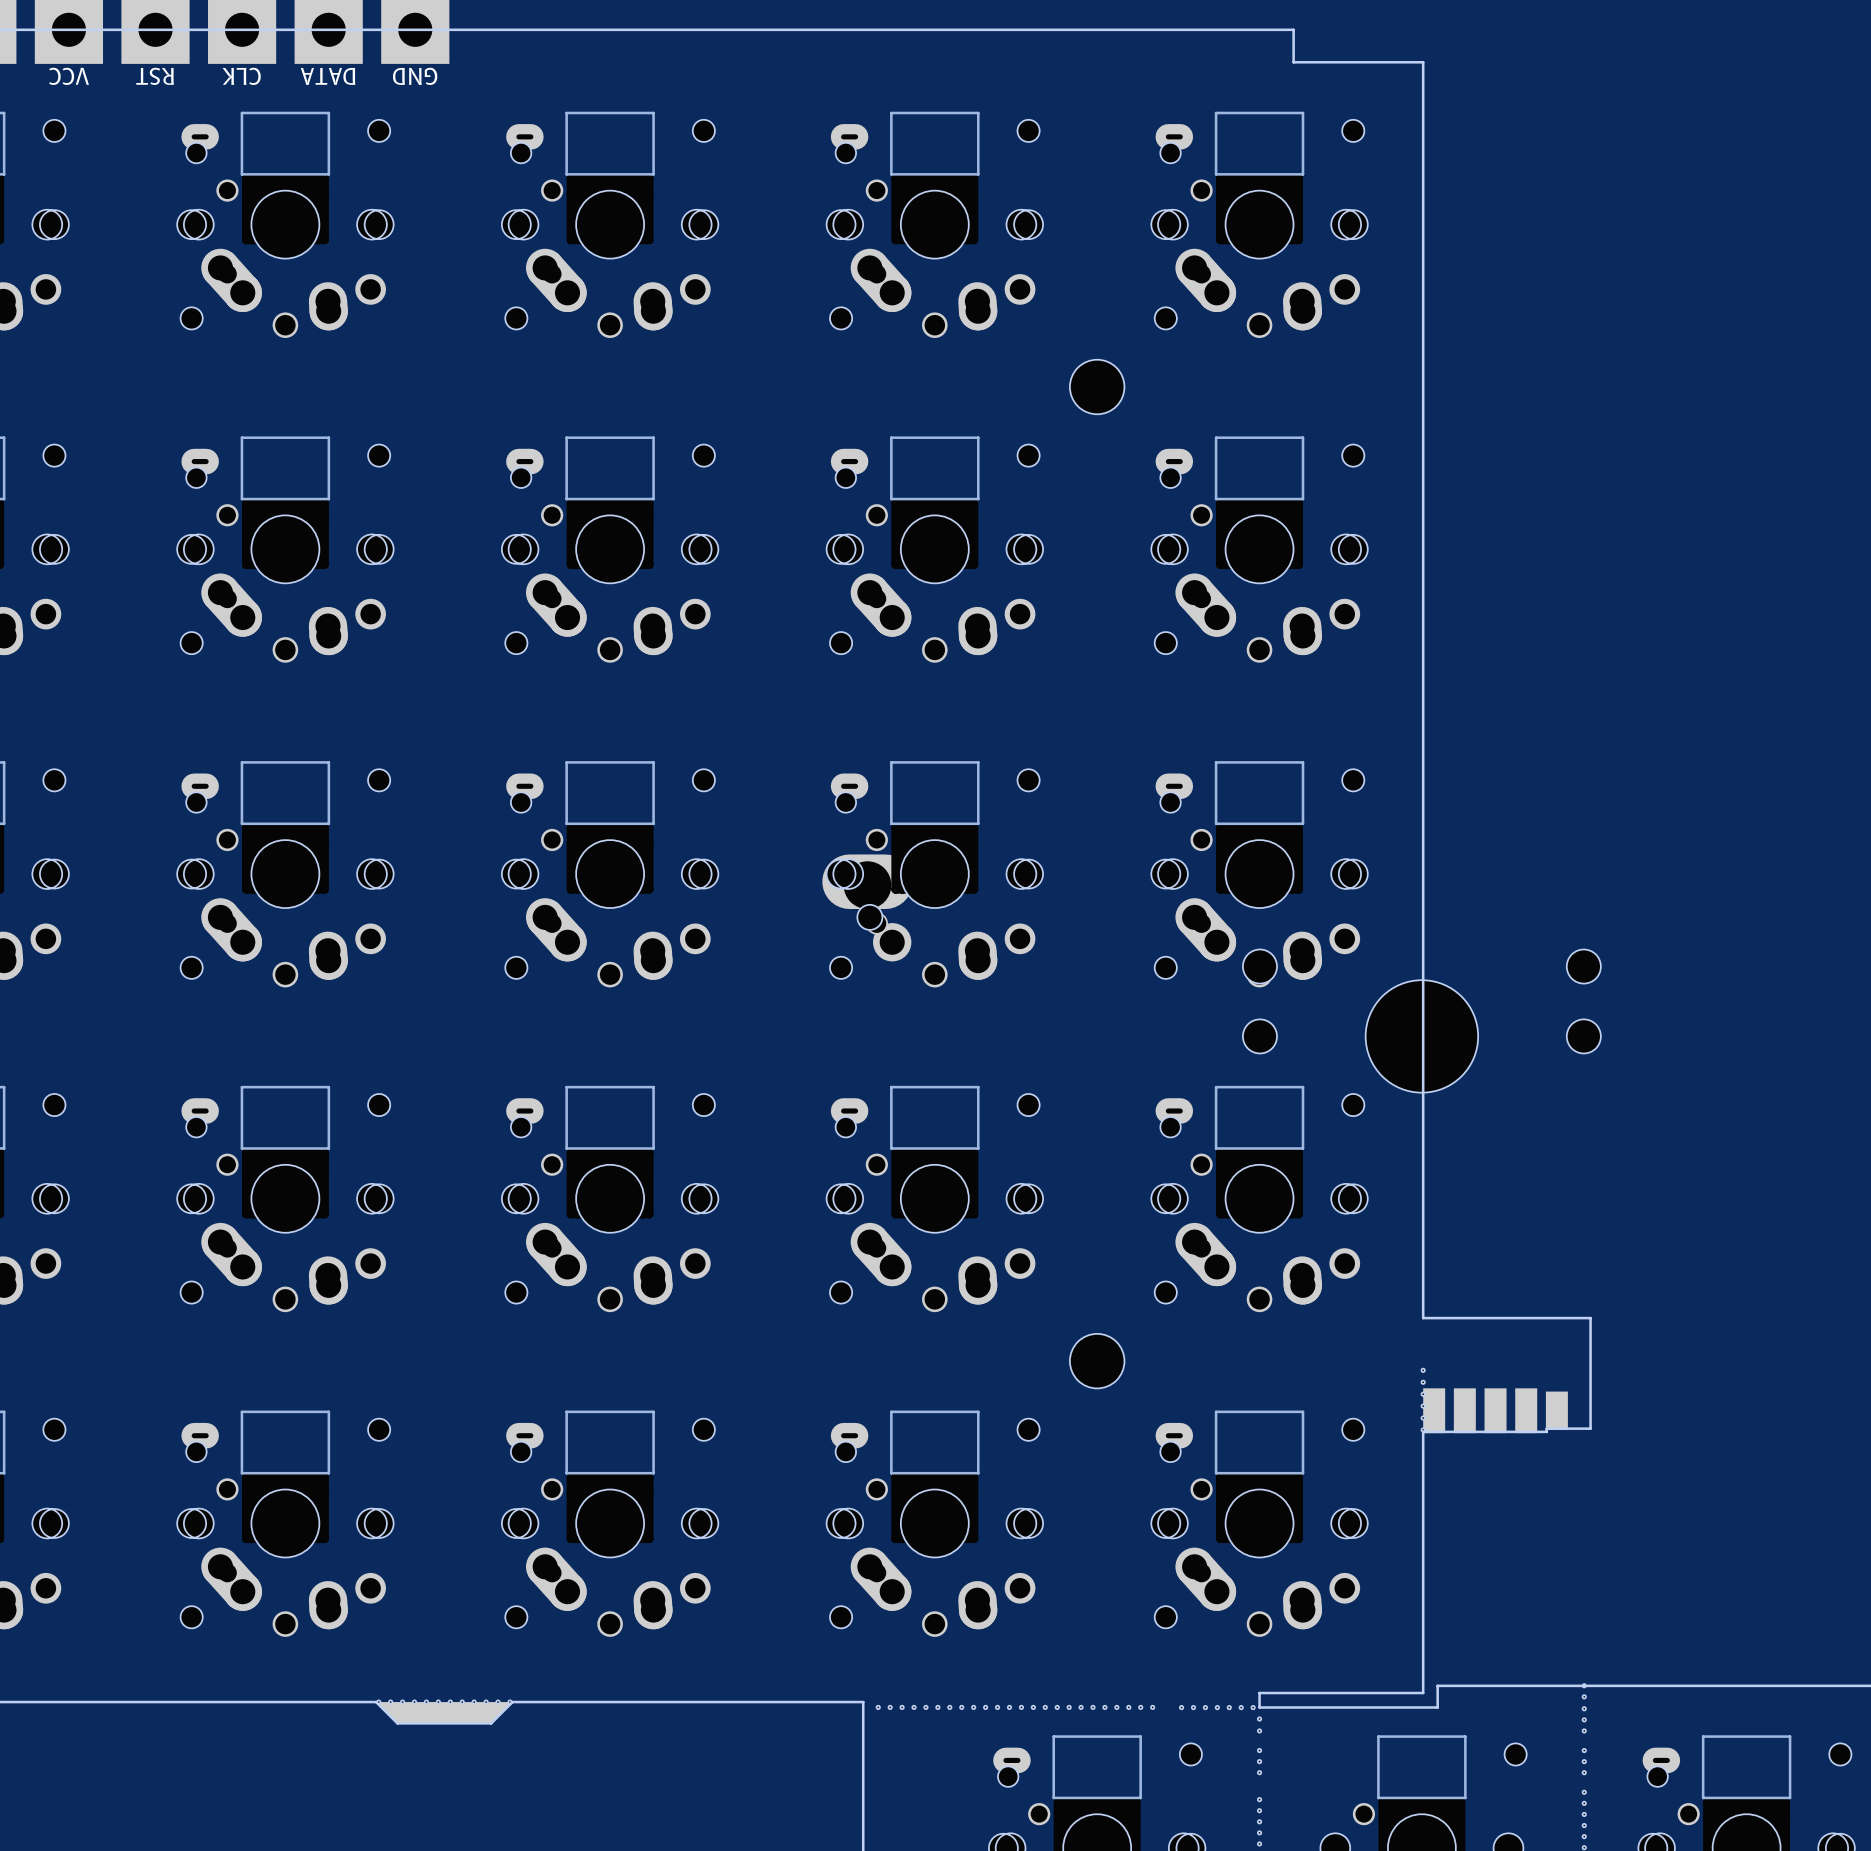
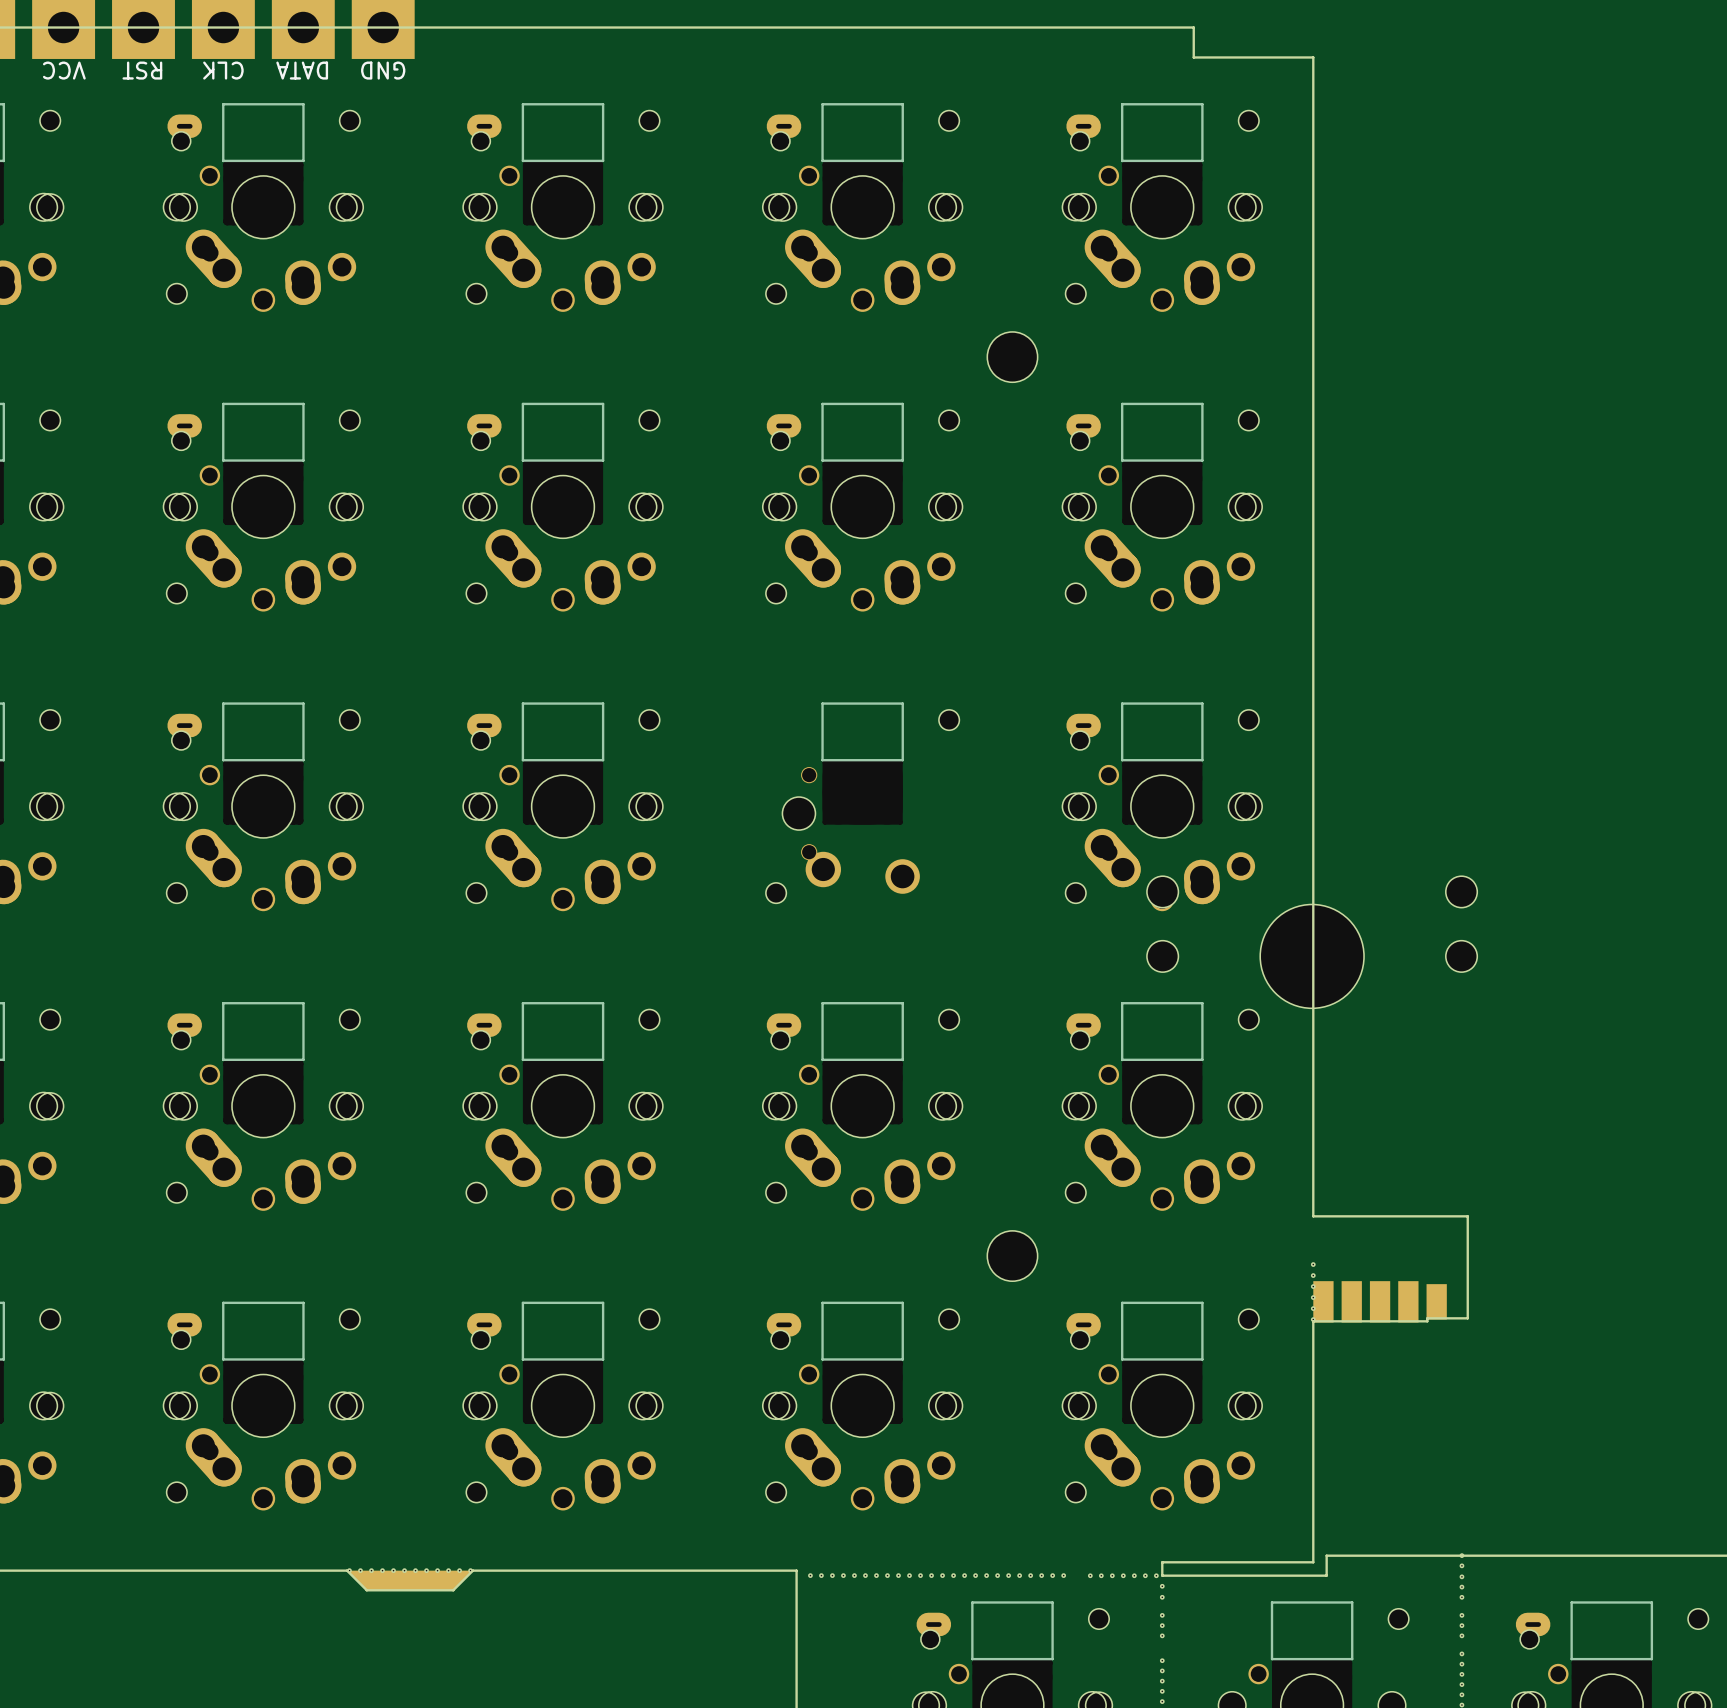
part footprint: [826, 761, 1044, 988] -> [765, 702, 960, 904]
part footprint: [822, 854, 913, 910] -> [782, 797, 816, 831]

